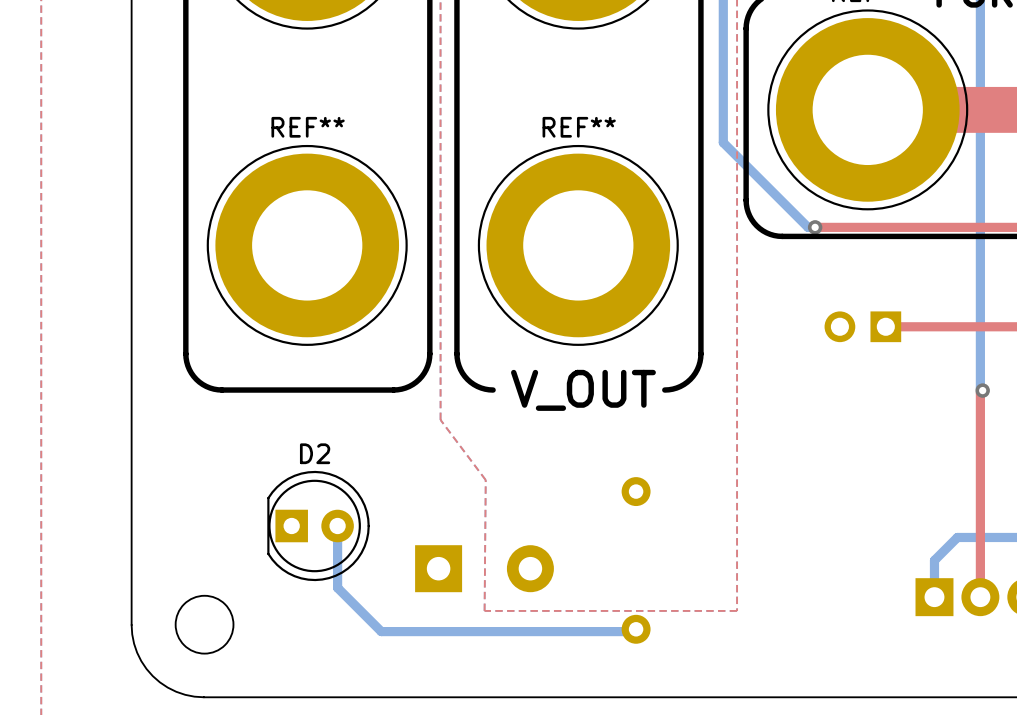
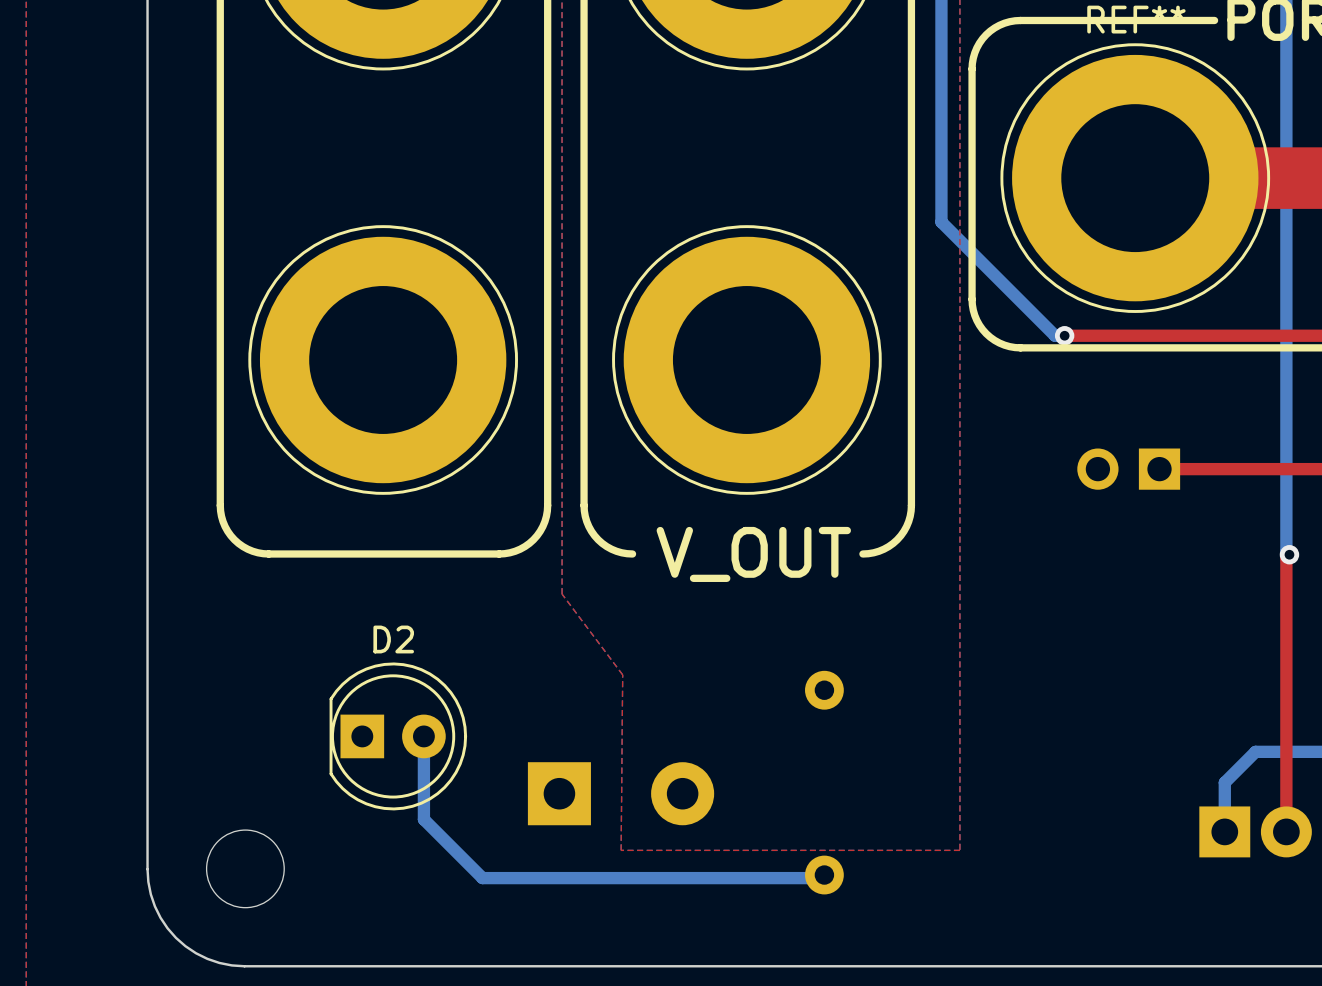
REF** name: REF** (308, 127) -> none
REF** name: REF** (579, 127) -> none

